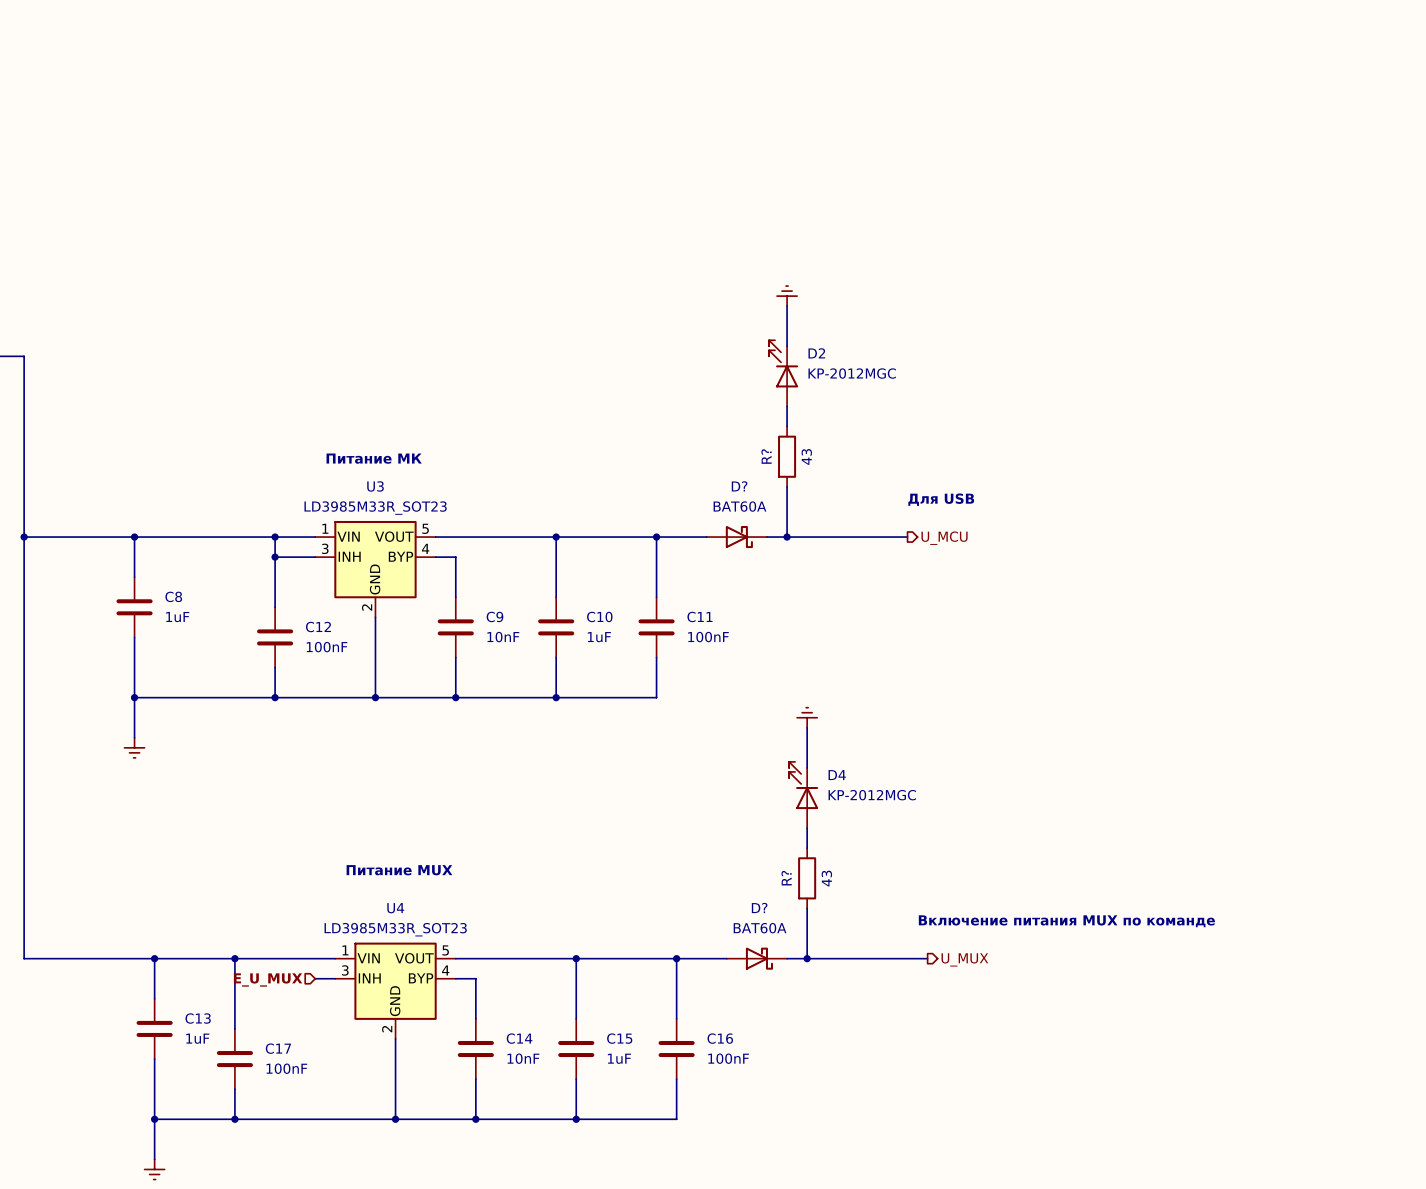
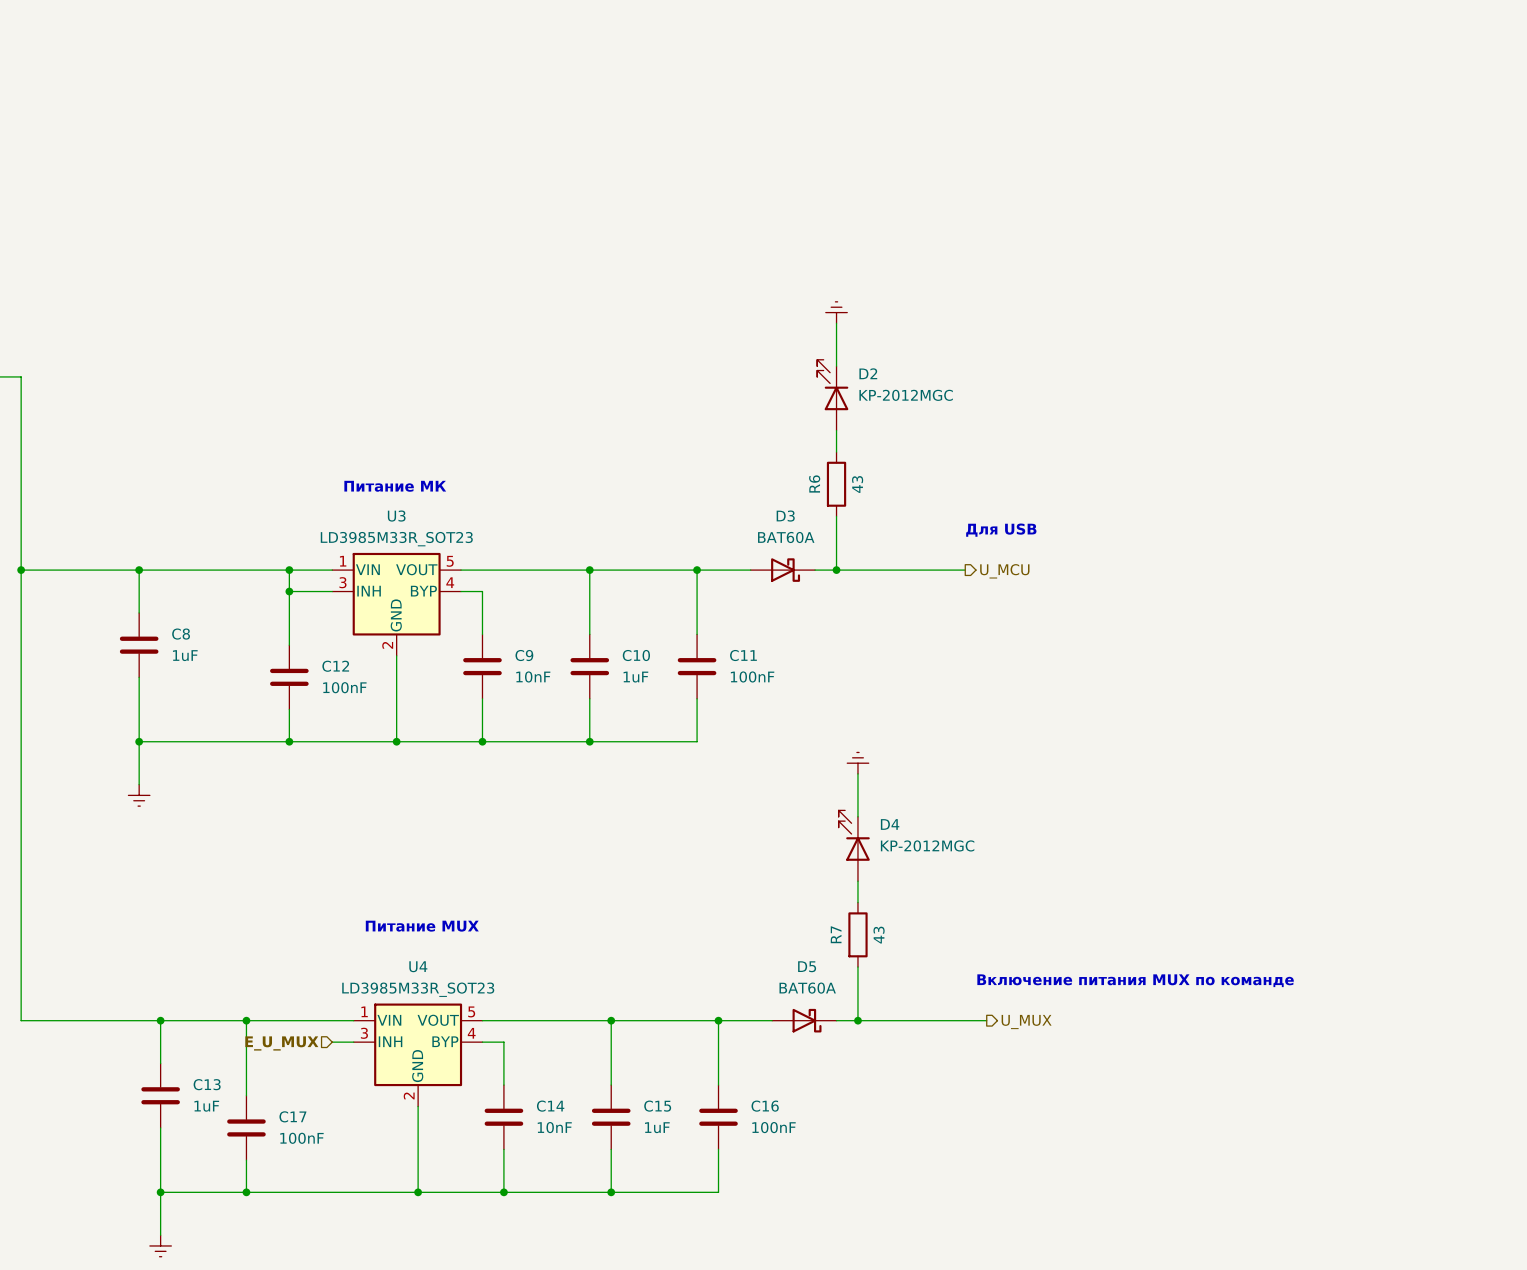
R? name: R? (766, 456) -> R6 (814, 483)
D? name: D? (739, 486) -> D3 (785, 516)
R? name: R? (786, 878) -> R7 (836, 934)
D? name: D? (759, 908) -> D5 (807, 966)

